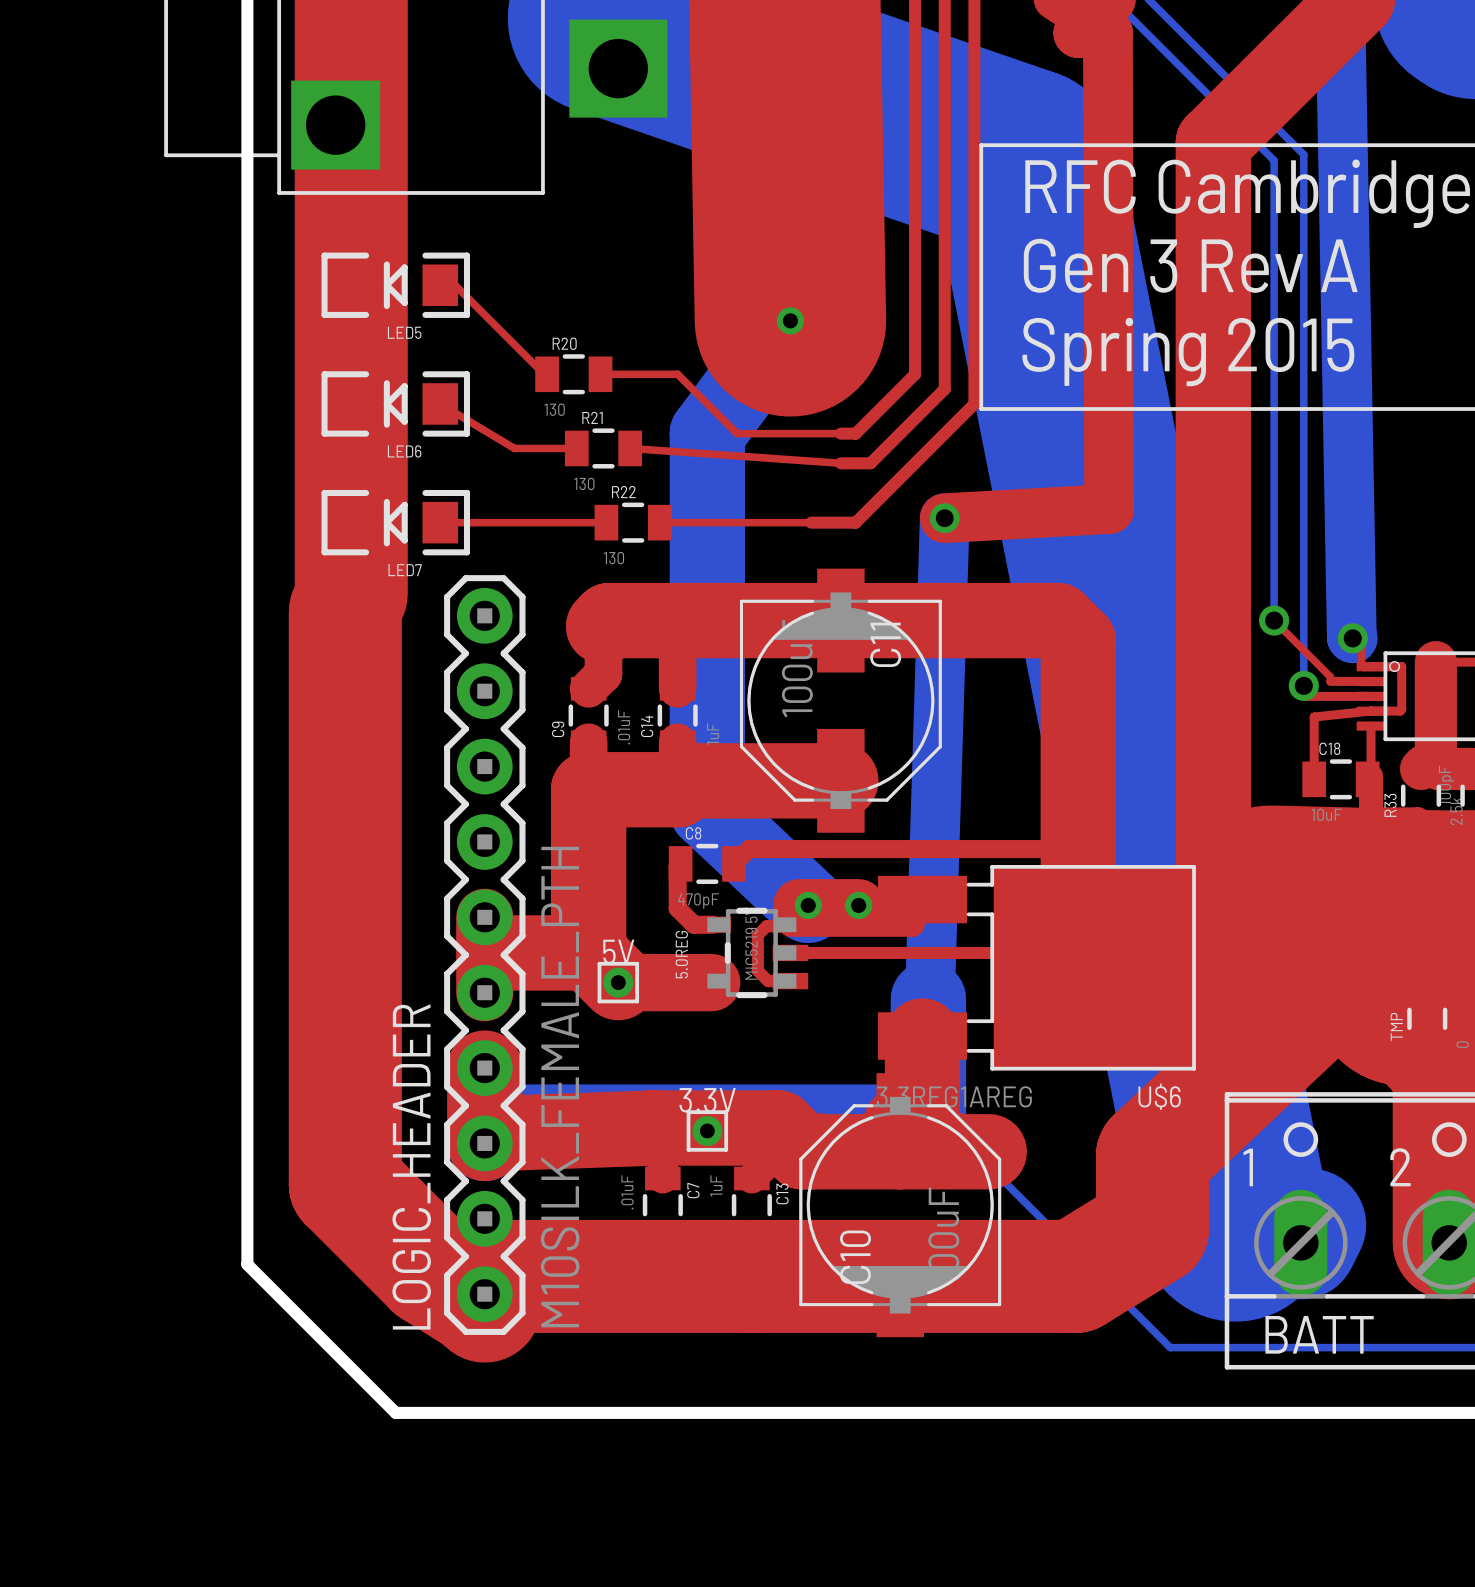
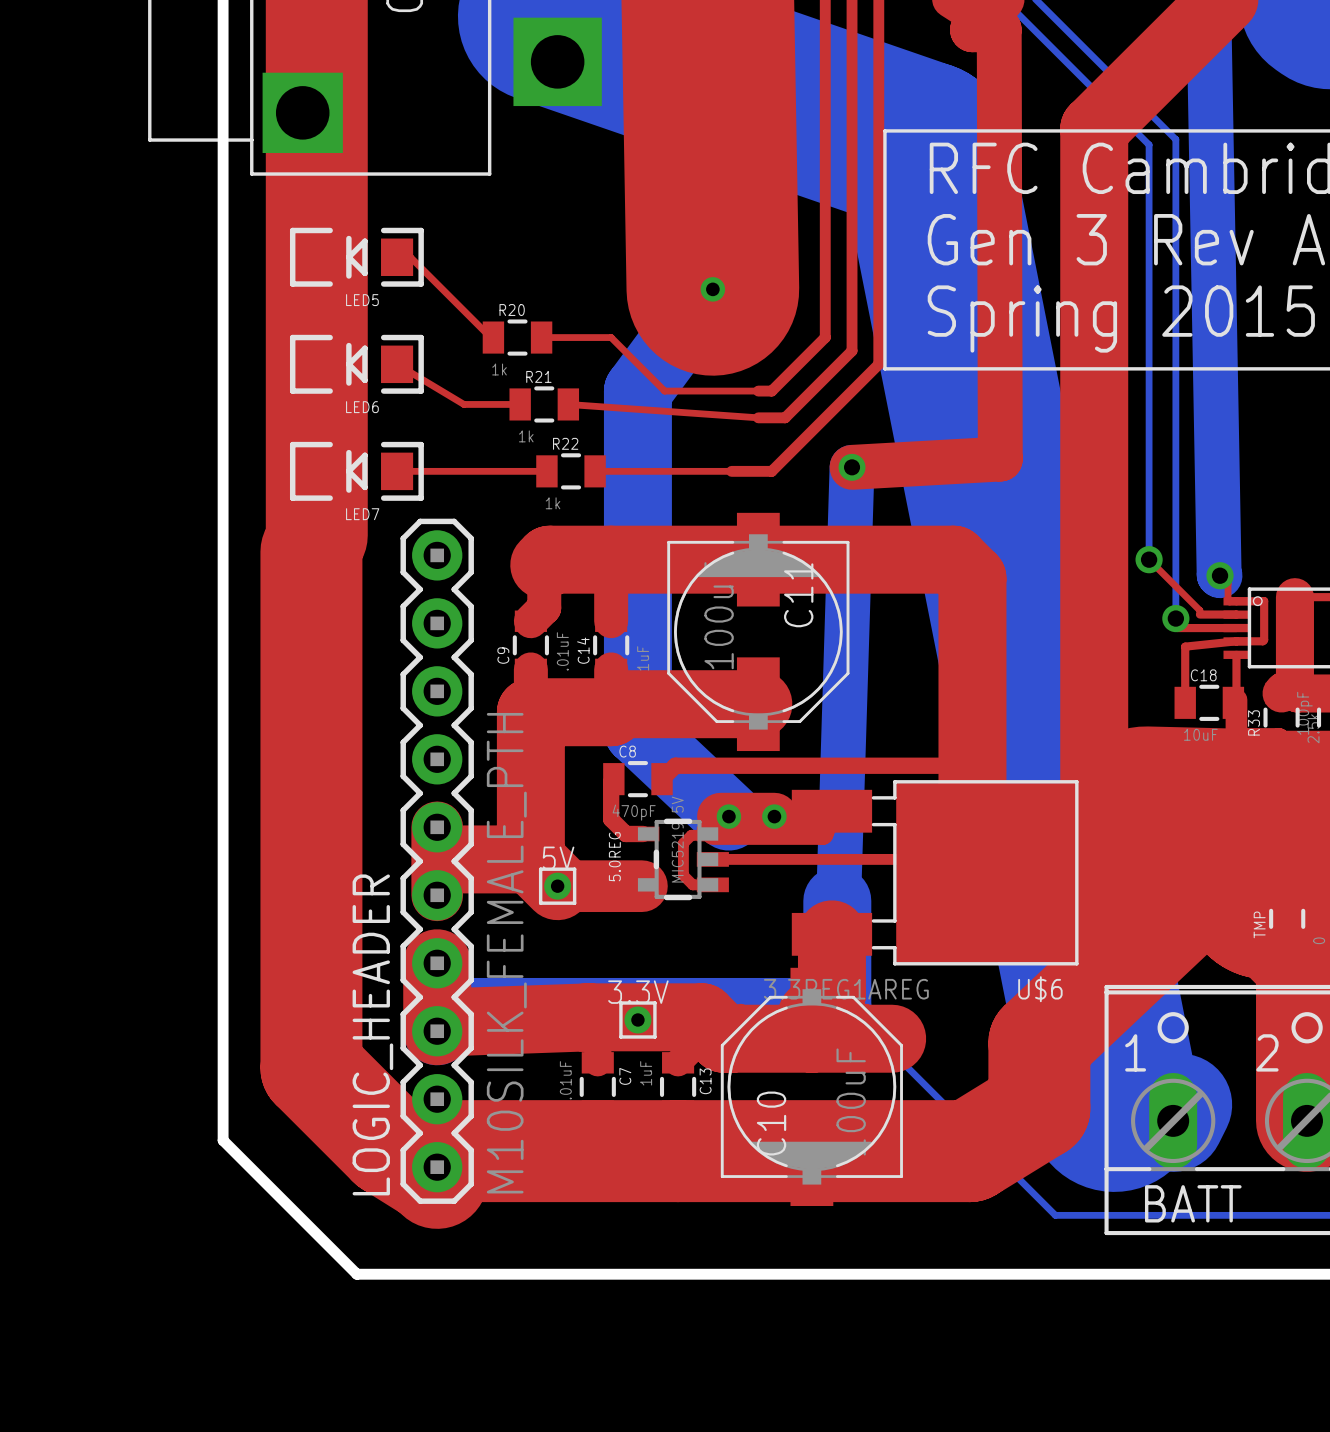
R20 value: 130 (554, 409) -> 1k (499, 369)
R21 value: 130 (584, 483) -> 1k (526, 436)
R22 value: 130 (614, 558) -> 1k (553, 503)

